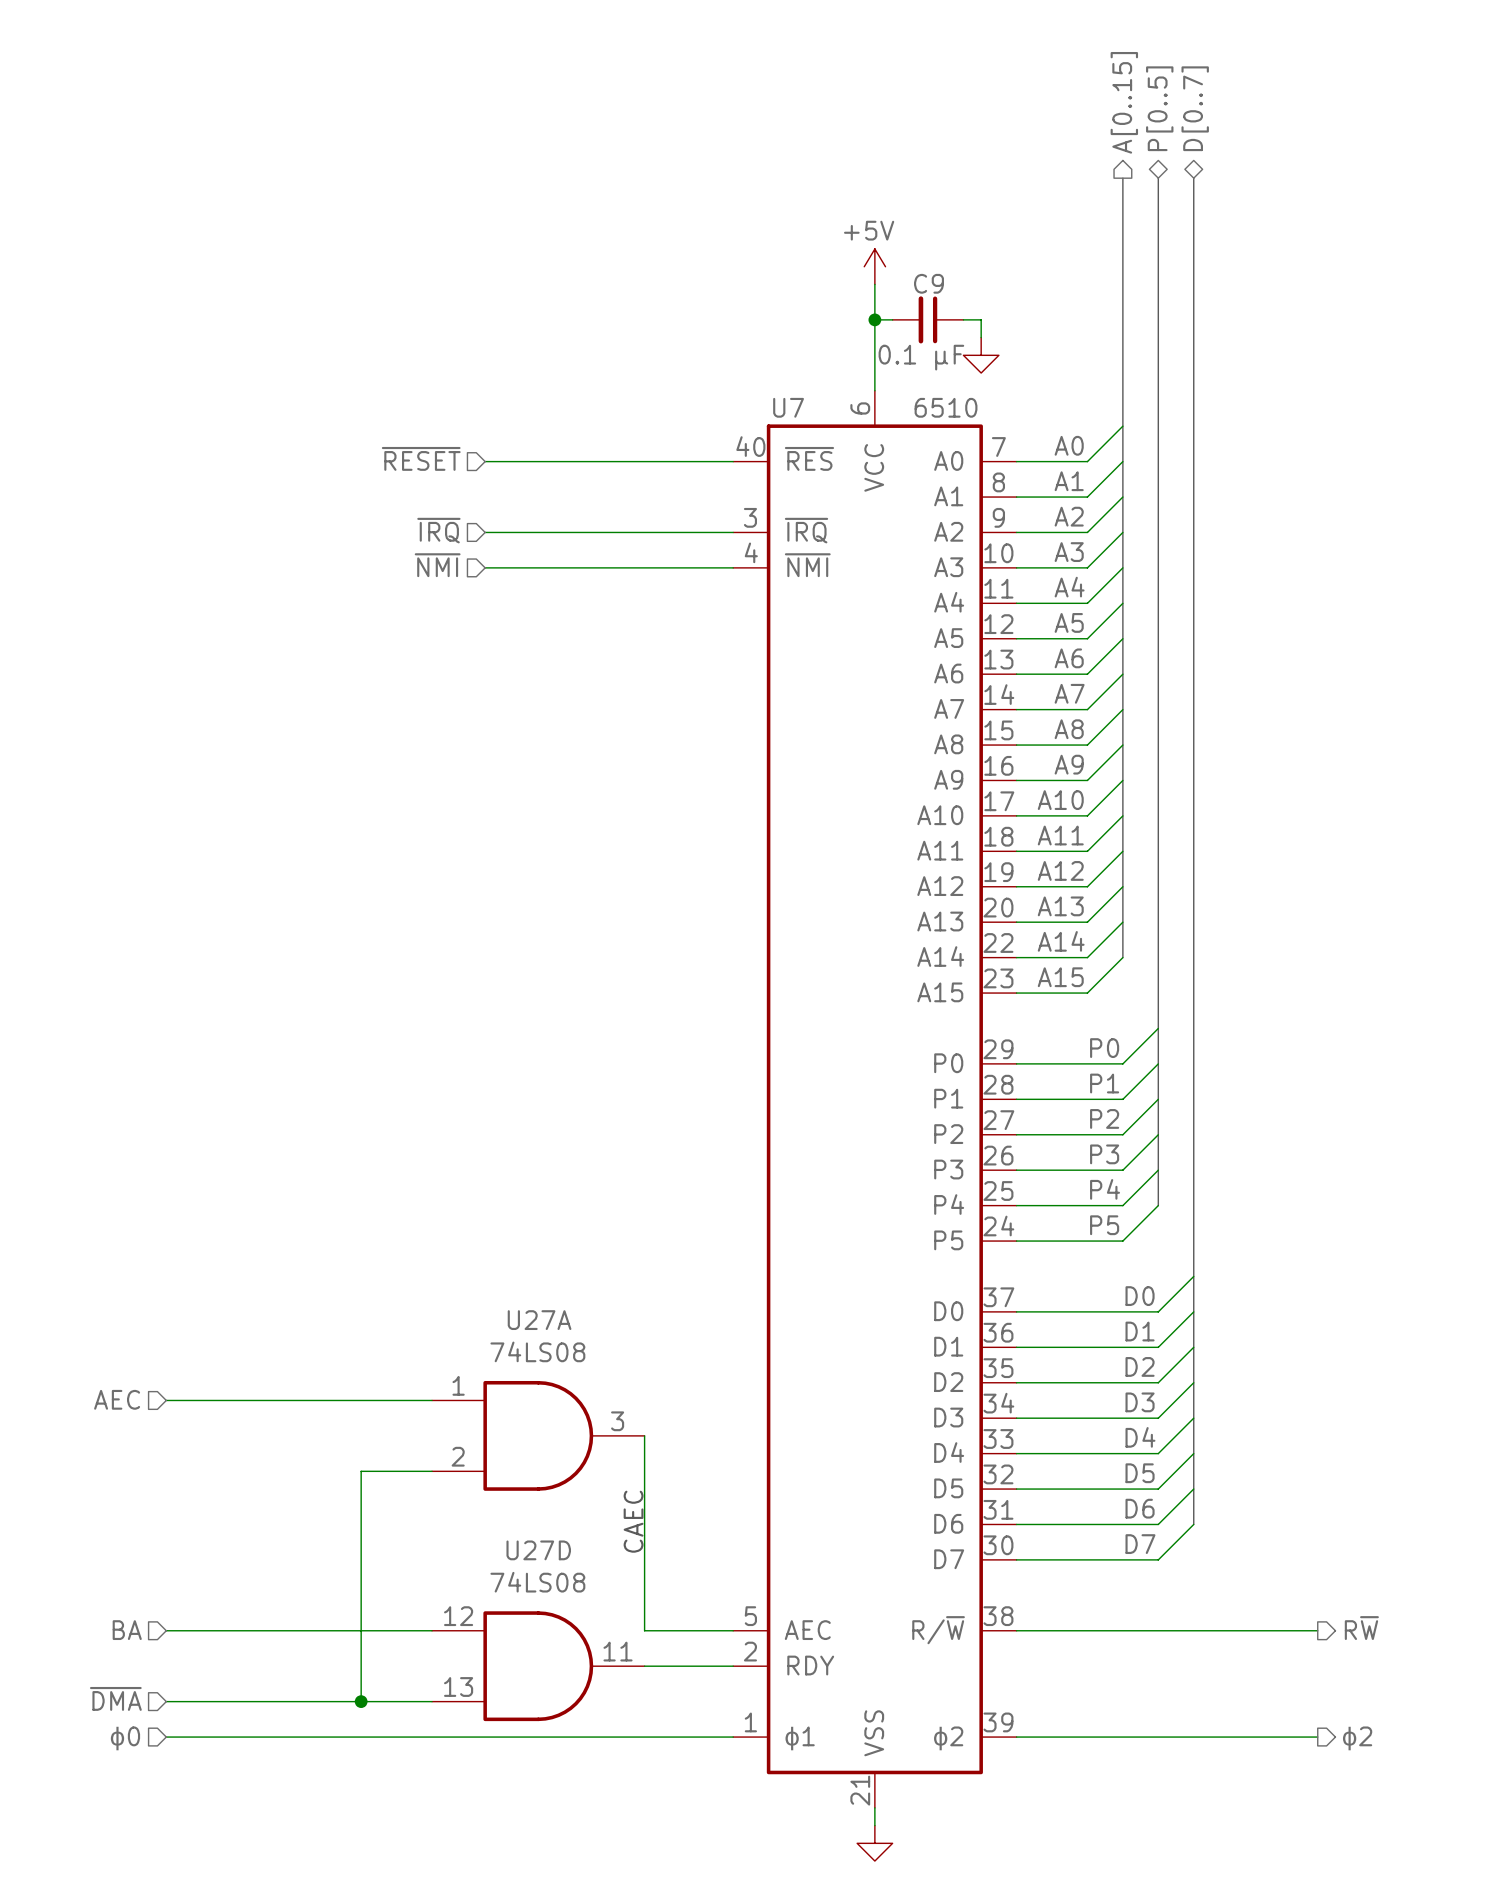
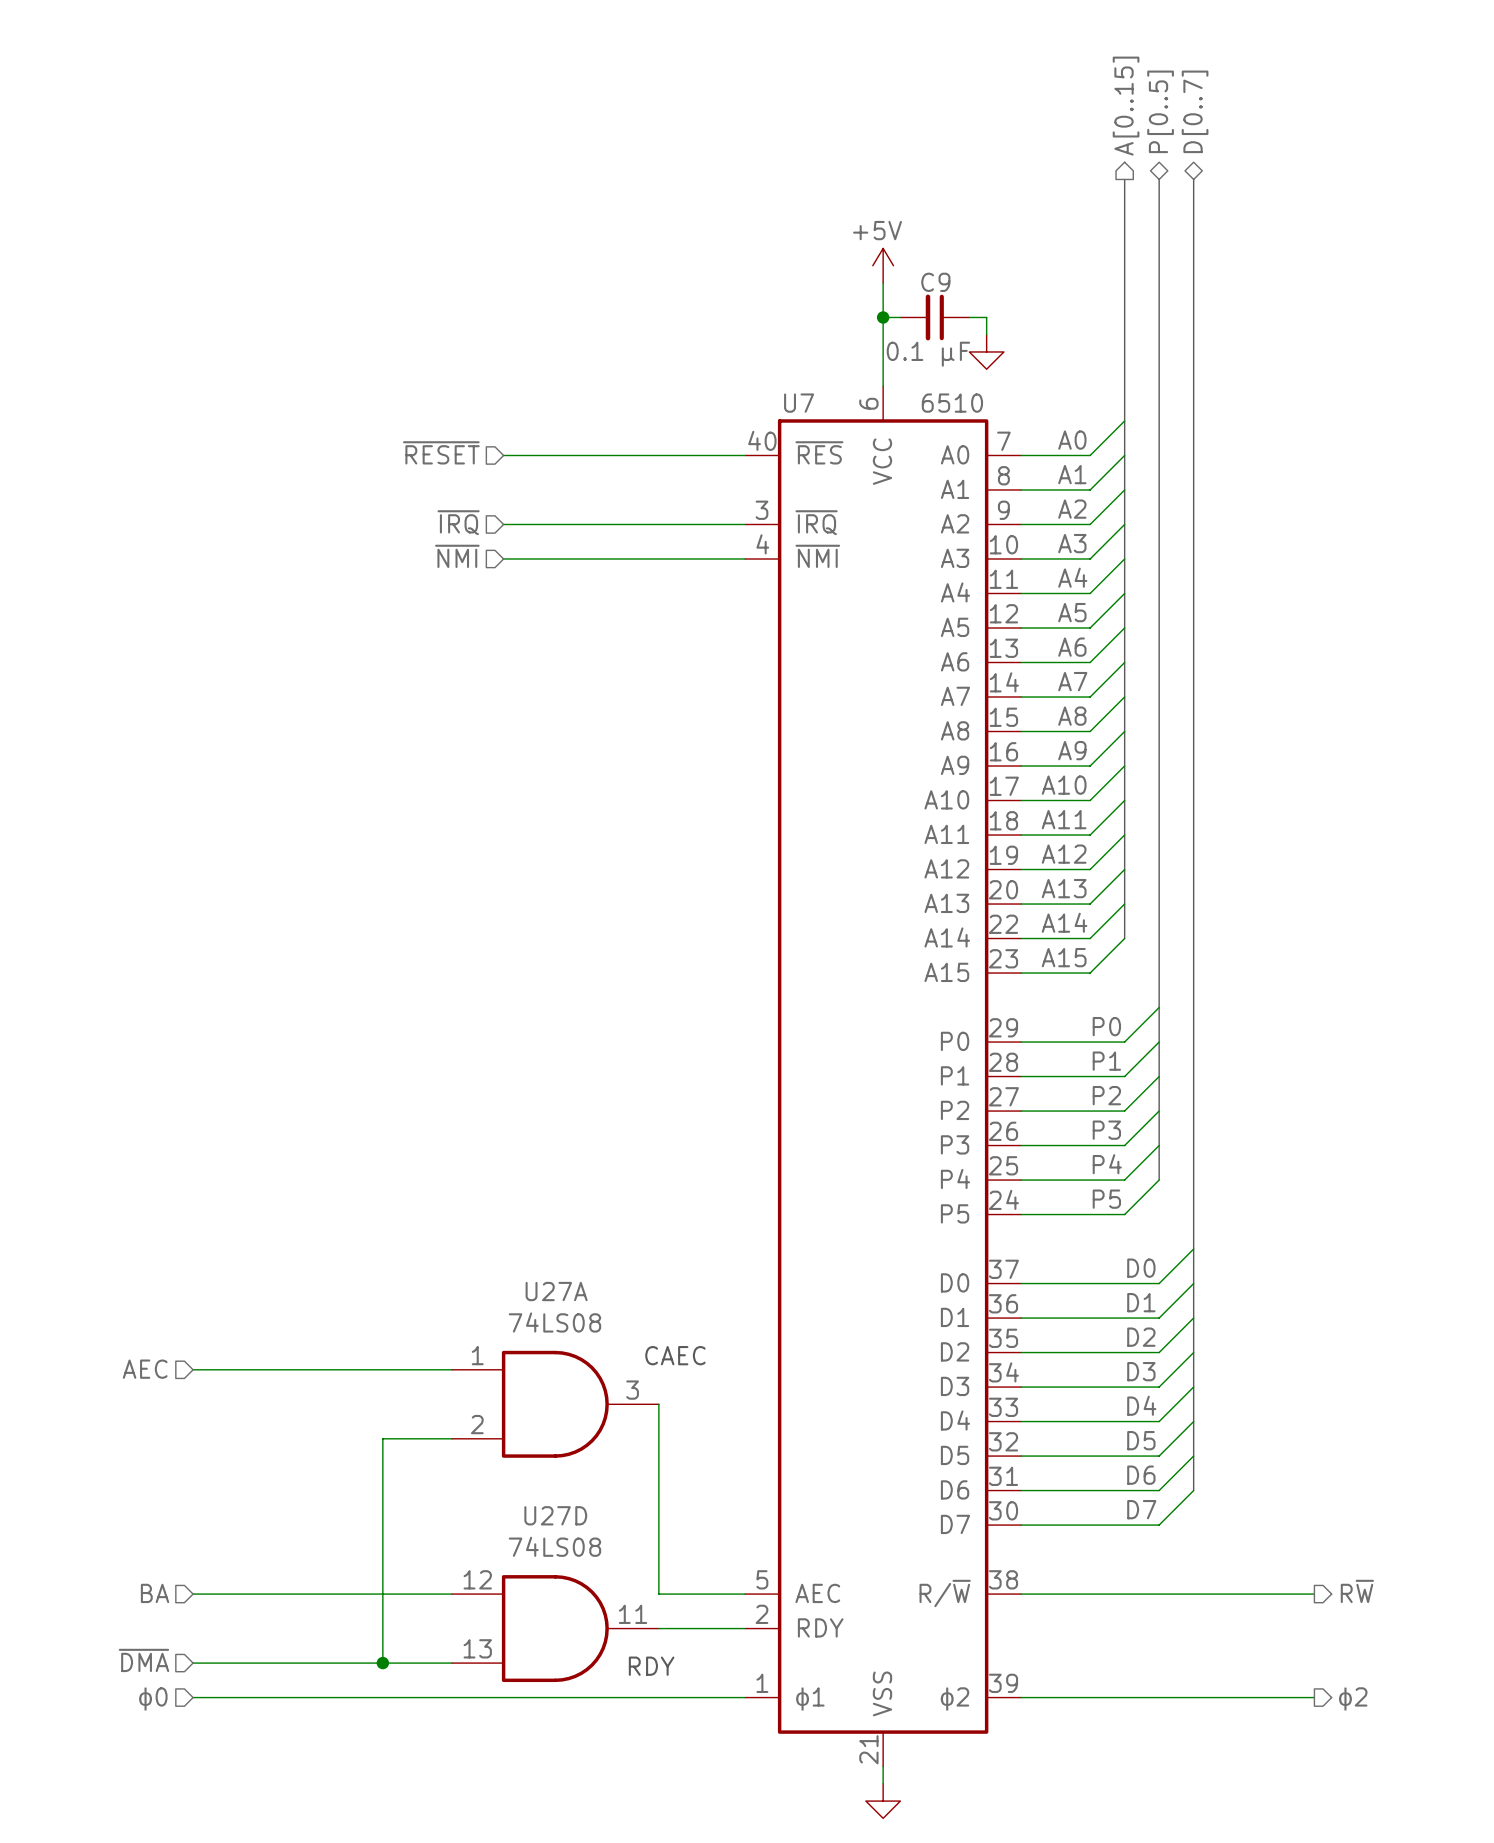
text rotation: 0° (633, 1521) -> 90° clockwise (675, 1355)
text position: CAEC (633, 1521) -> CAEC (675, 1355)
text: none -> RDY (651, 1666)

